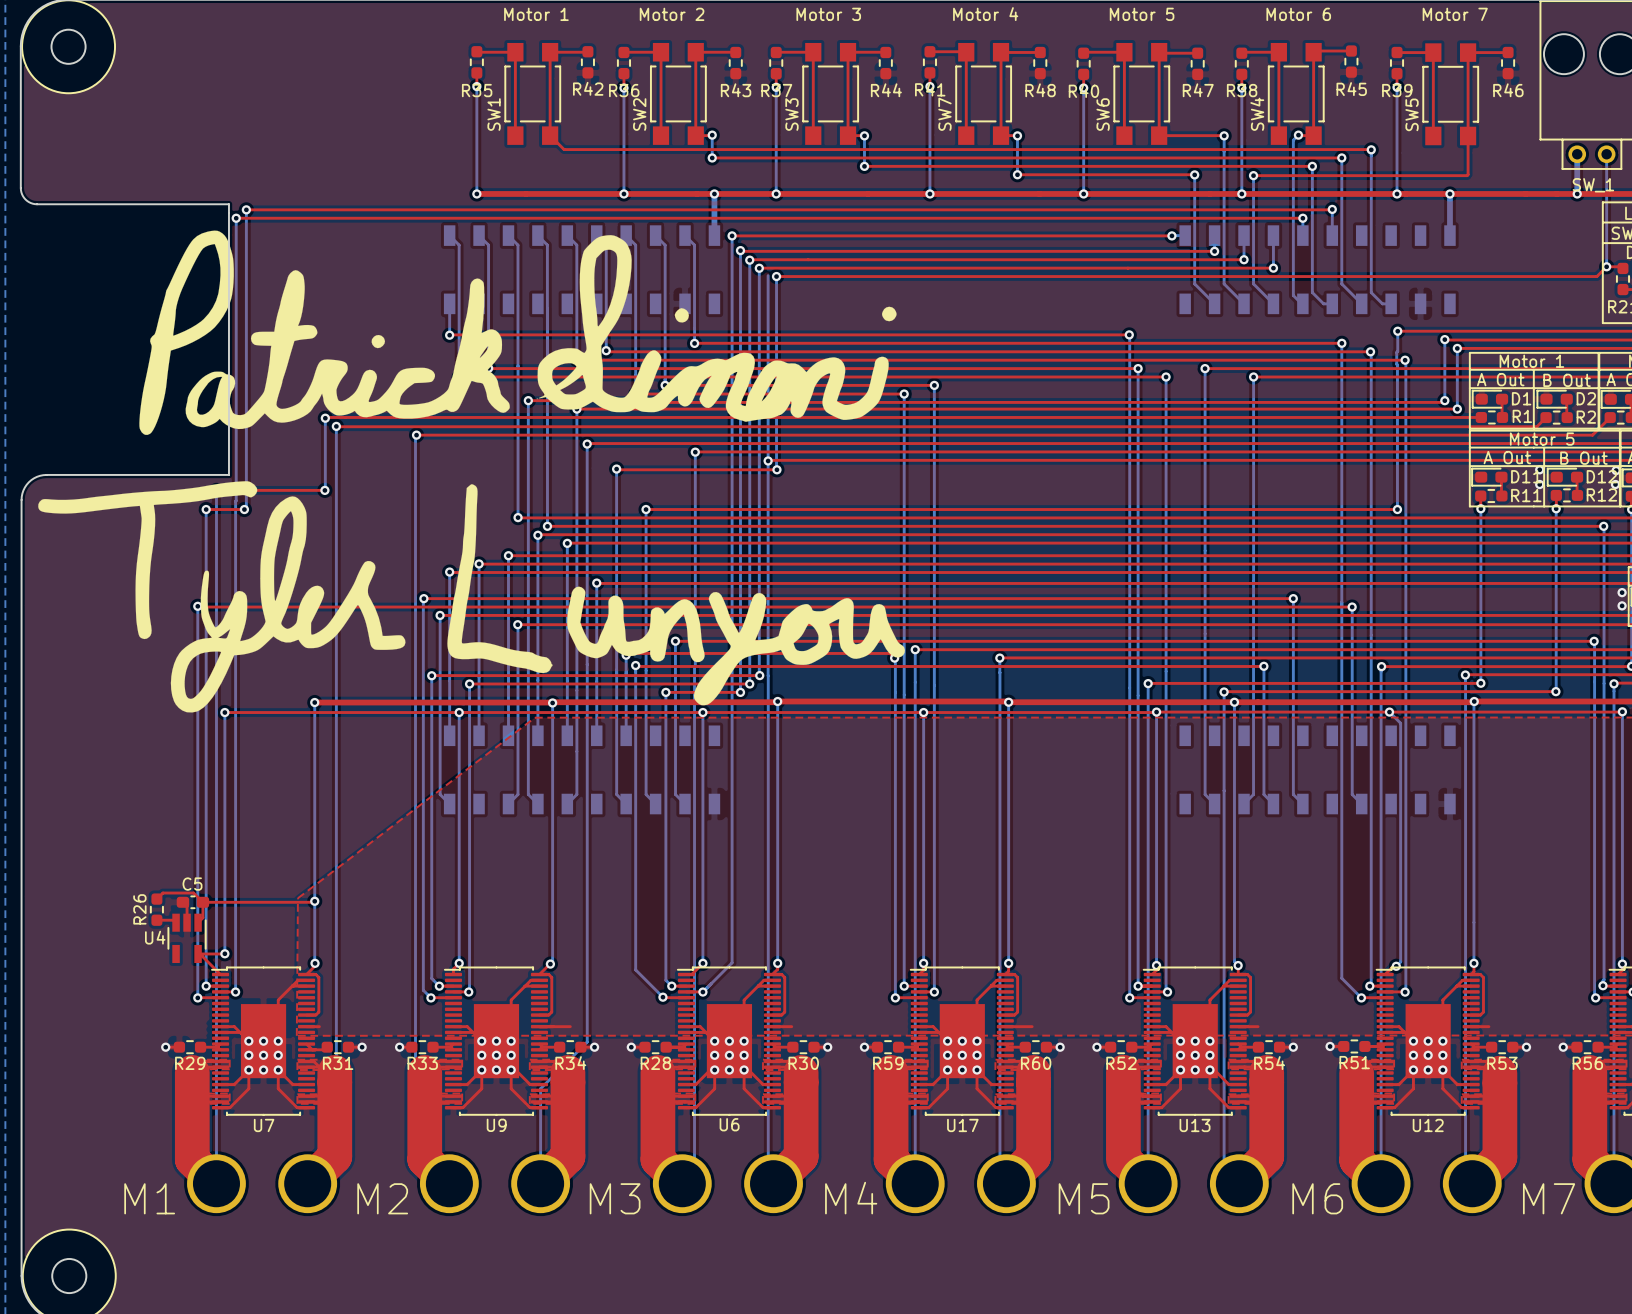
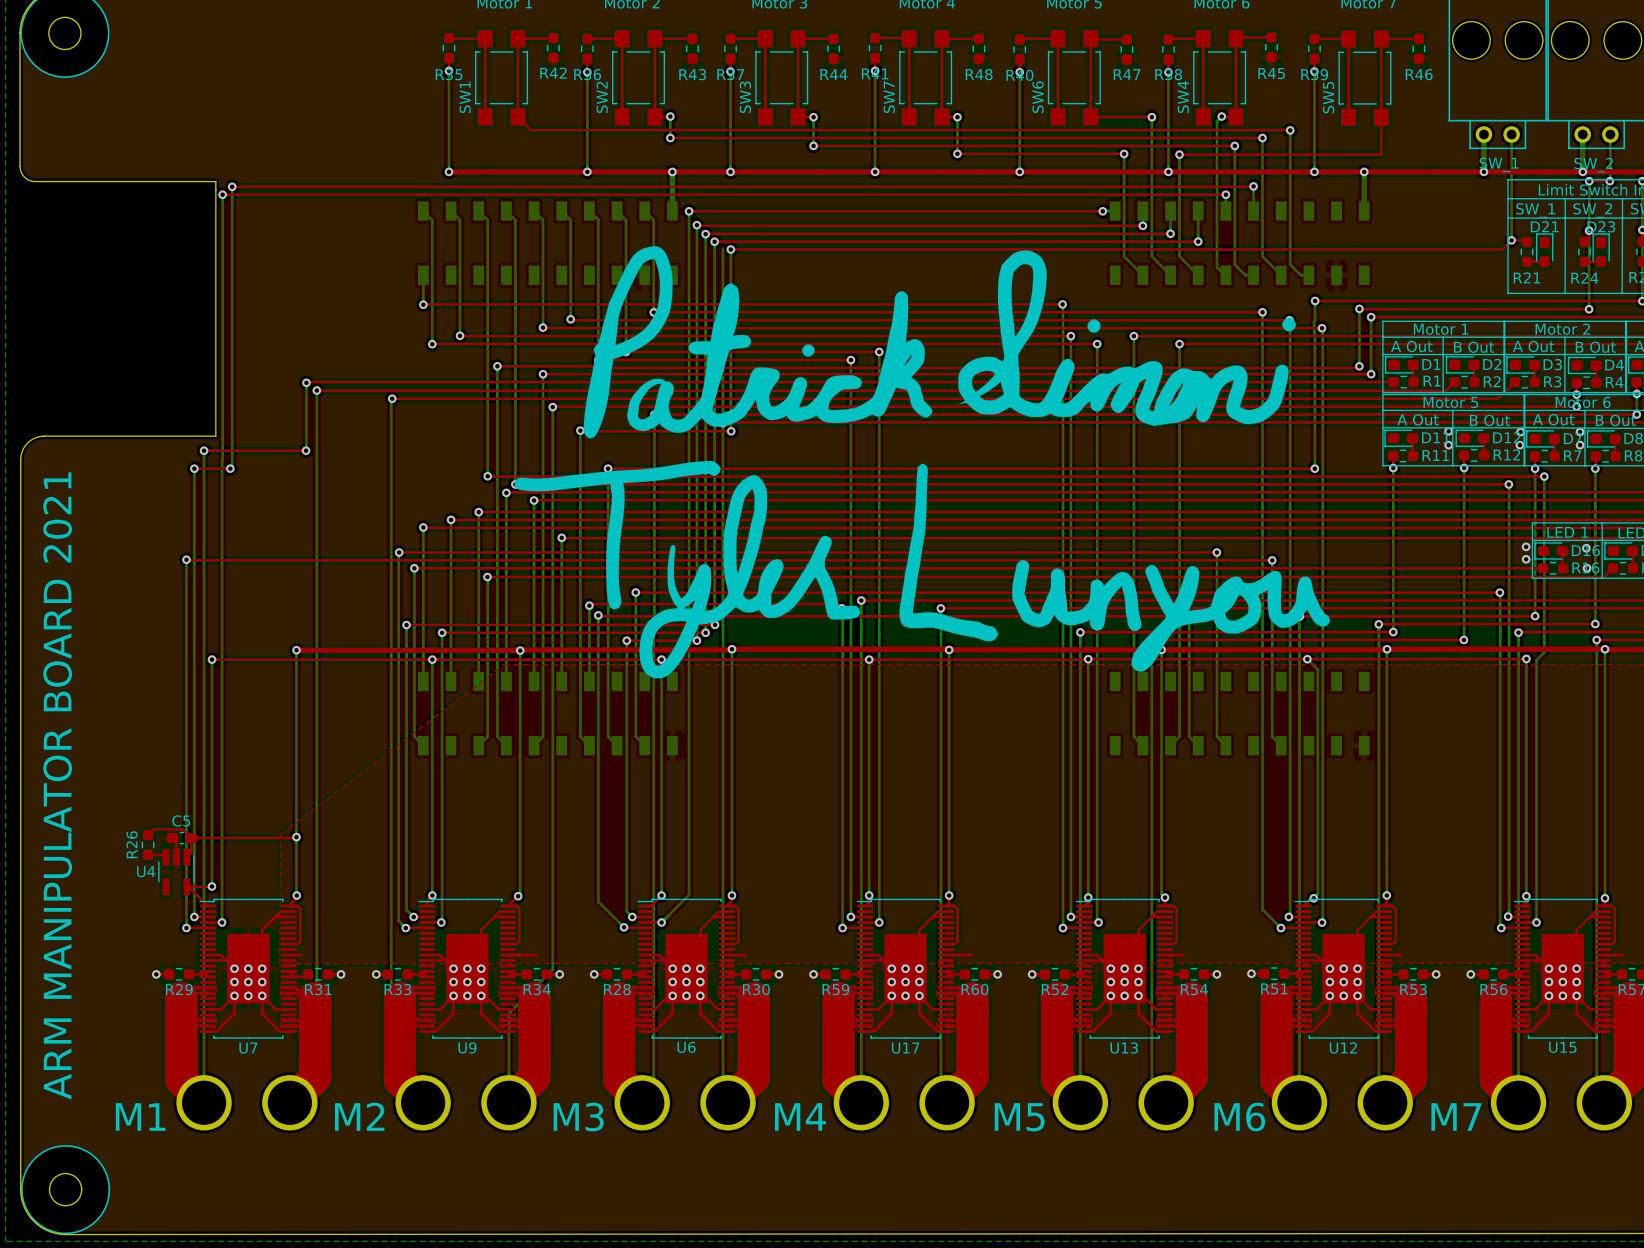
drawing: [139, 230, 897, 435] -> none
drawing: none -> [583, 246, 1296, 439]
drawing: [38, 481, 905, 713] -> none
drawing: none -> [514, 460, 1330, 679]
text: none -> ARM MANIPULATOR BOARD 2021 (57, 785)

